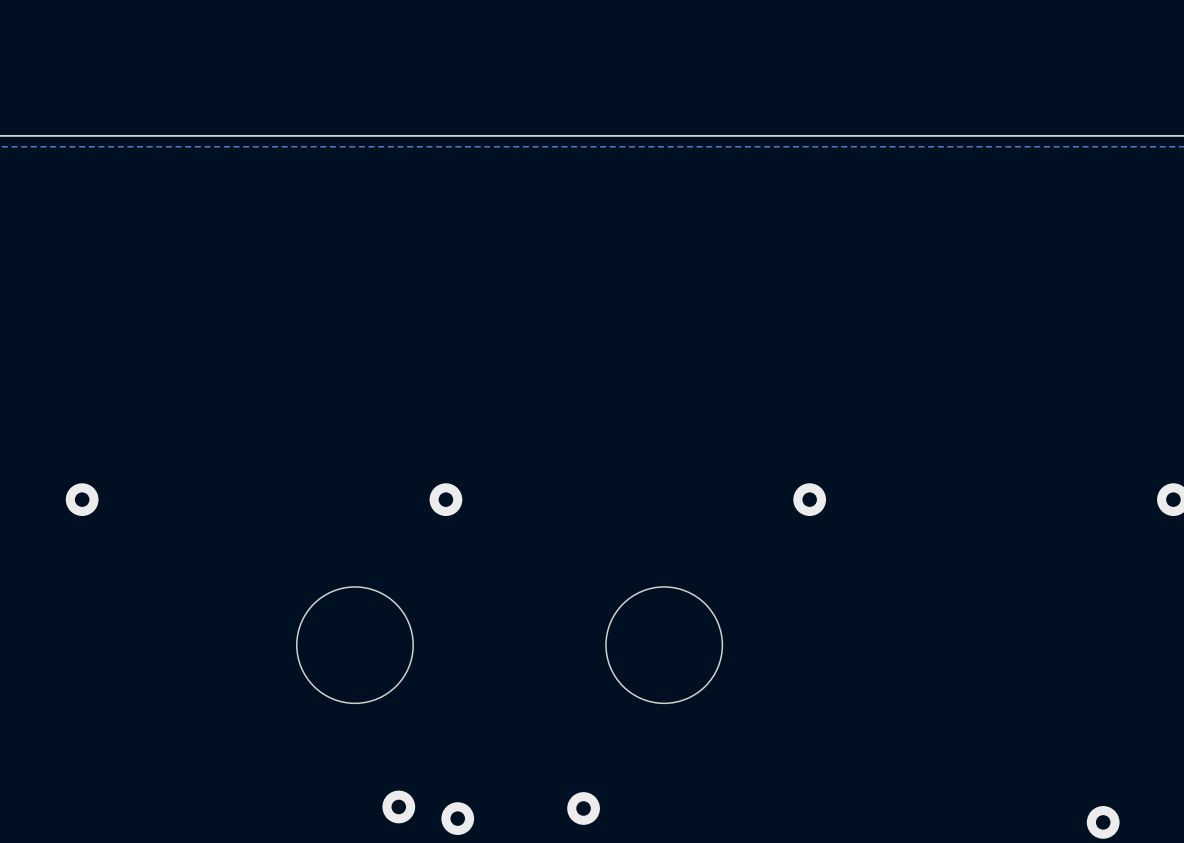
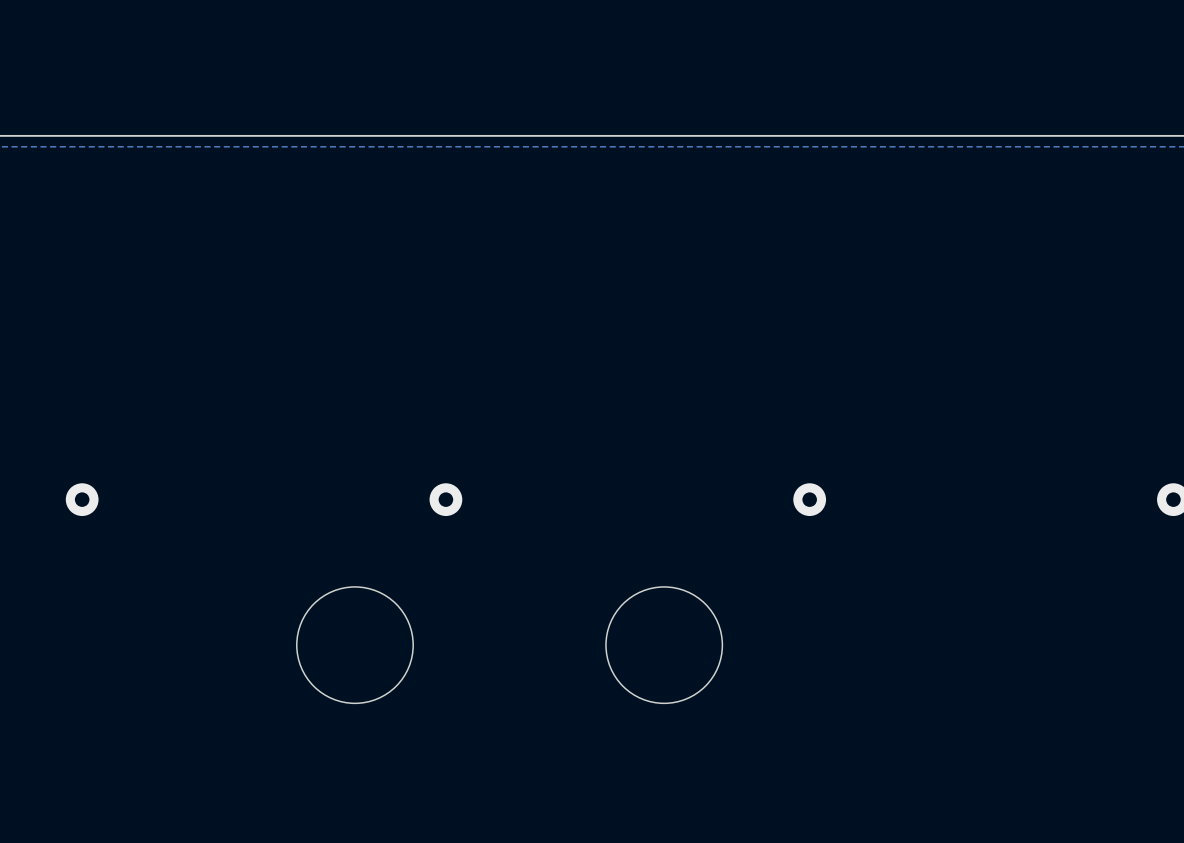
via: (398, 806) -> none
via: (583, 808) -> none
via: (457, 818) -> none
via: (1103, 822) -> none

